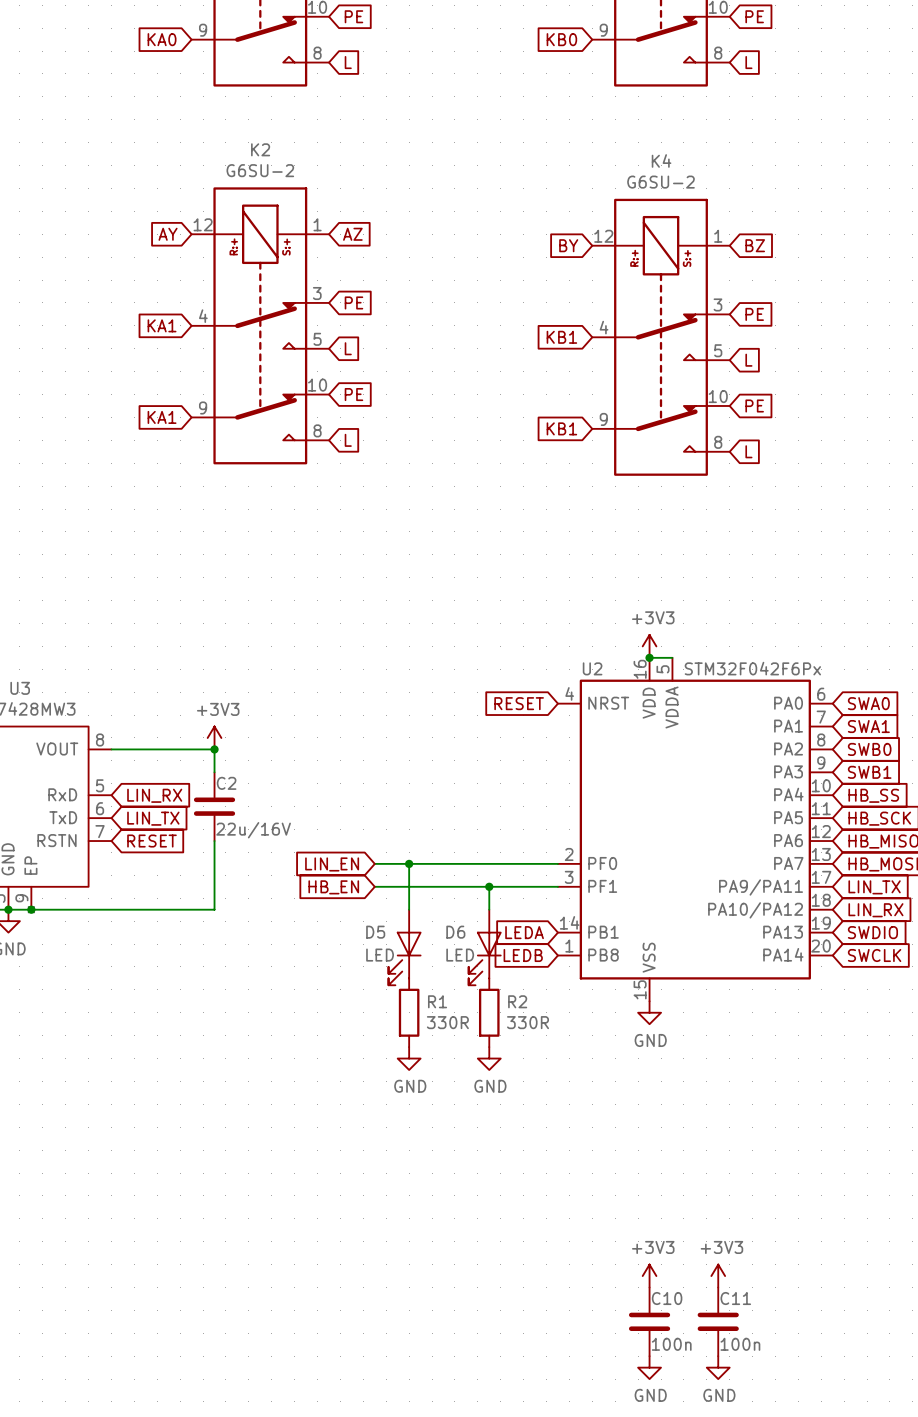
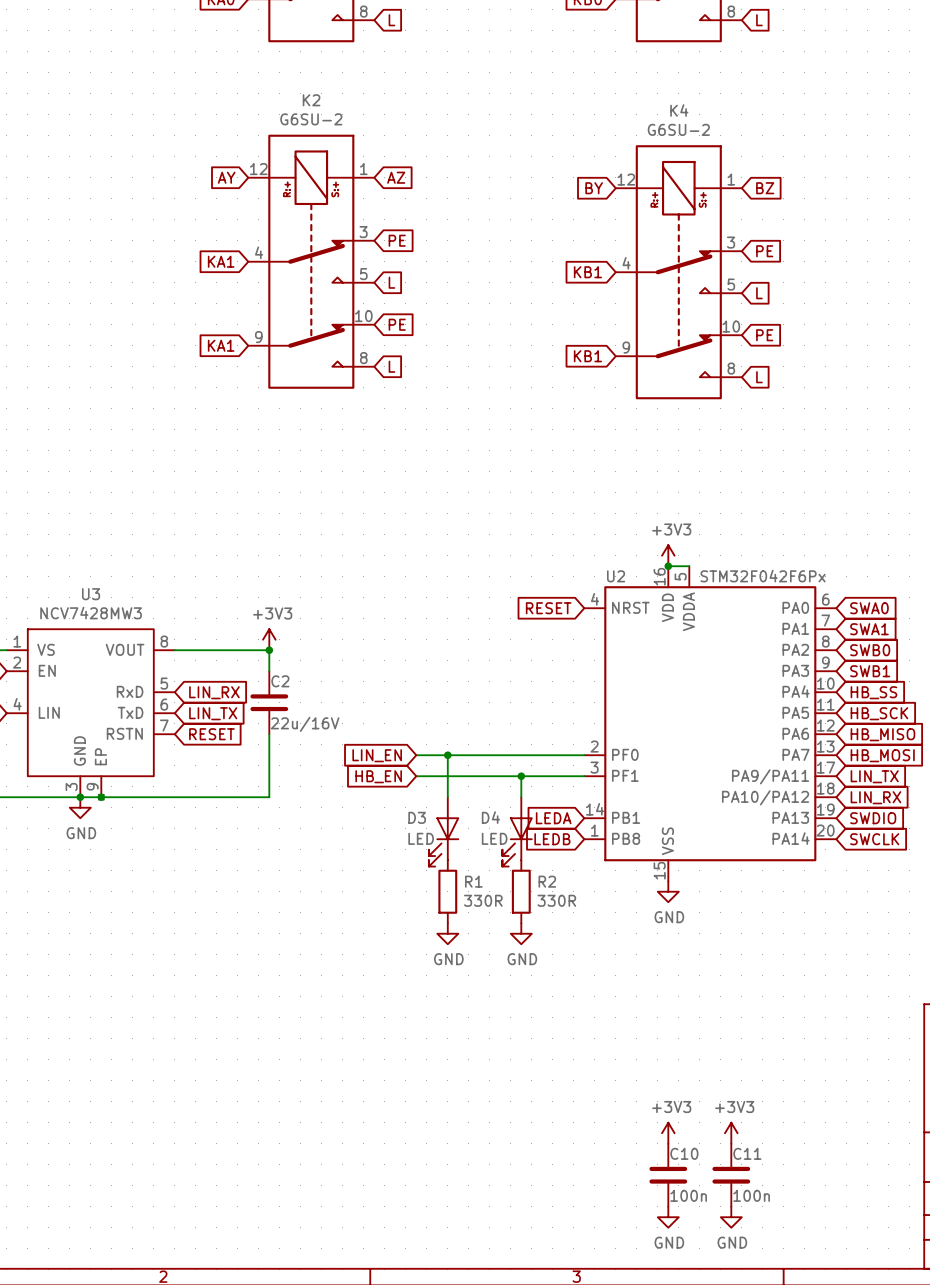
D5 name: D5 (375, 932) -> D3 (417, 817)
D6 name: D6 (455, 932) -> D4 (490, 817)

